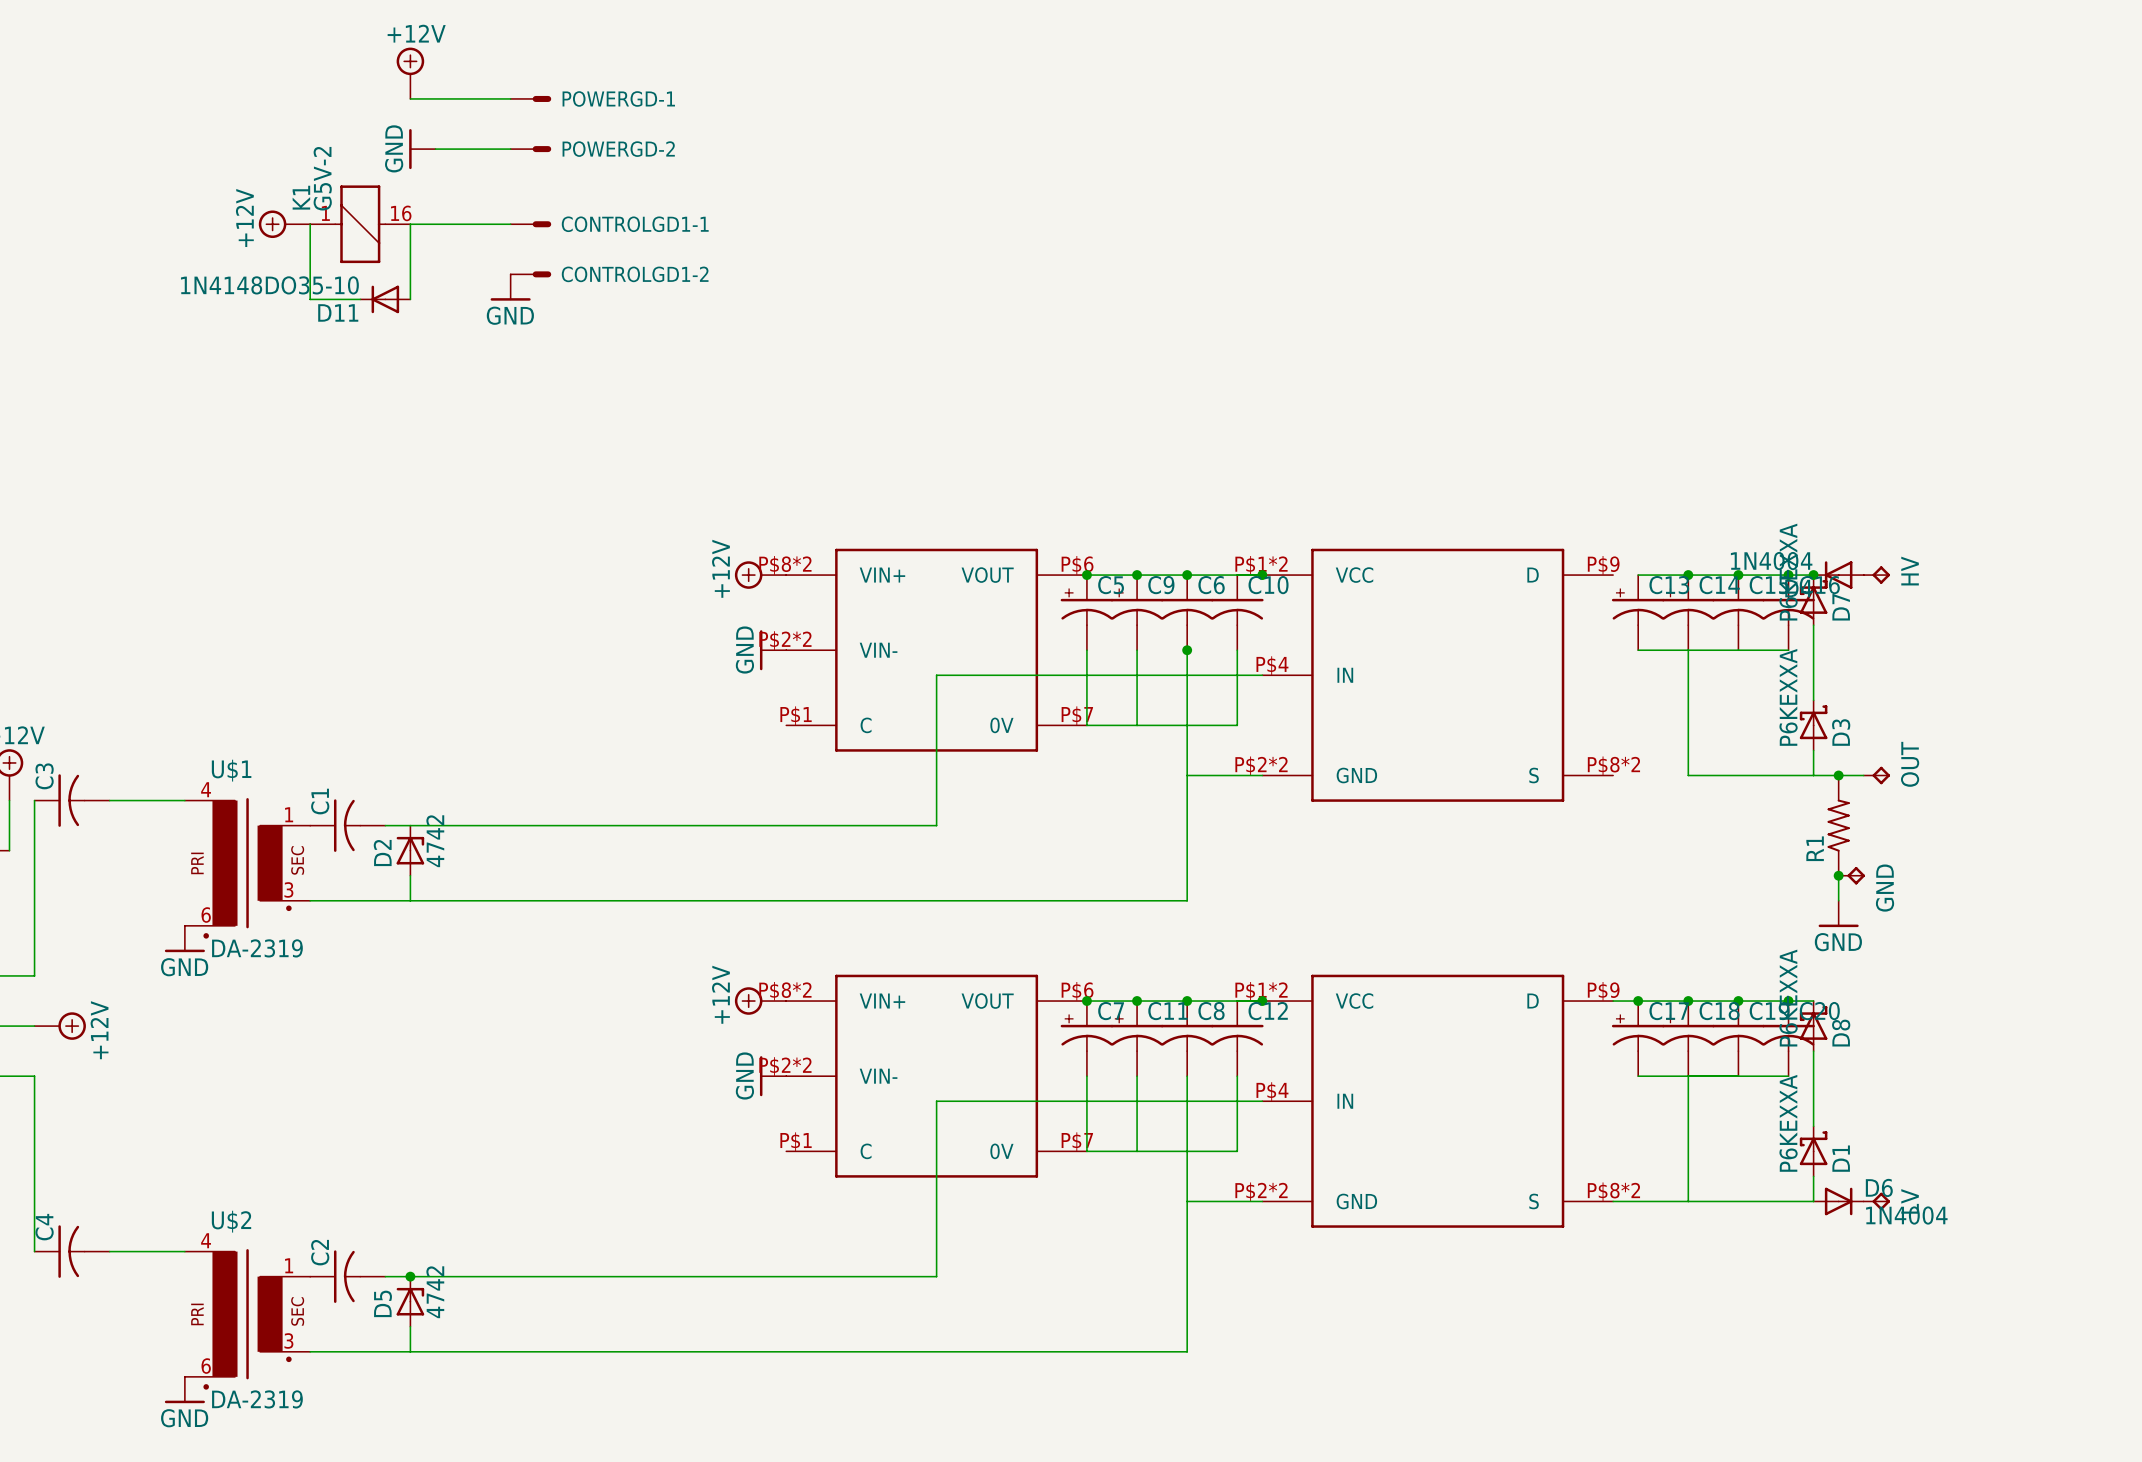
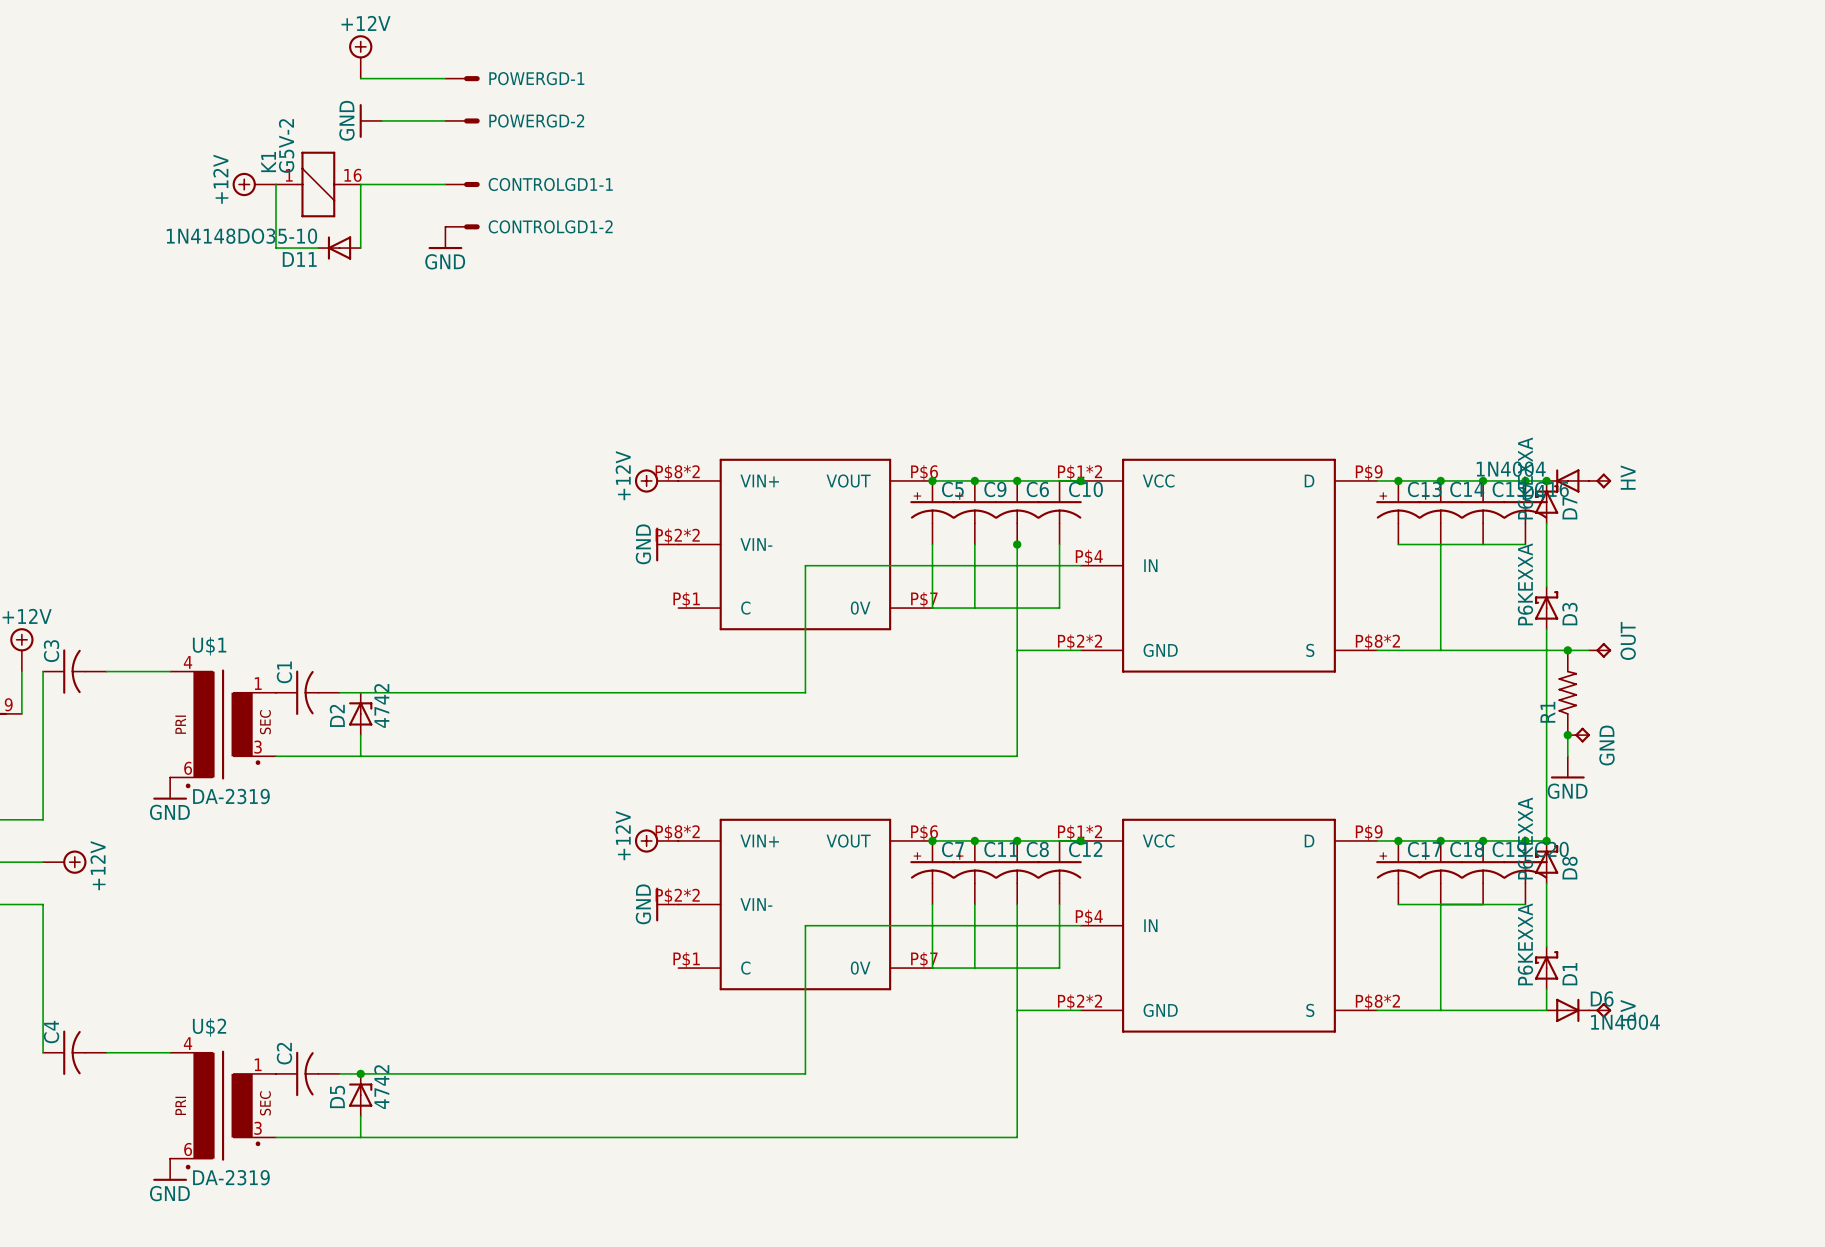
wire: none -> (1377, 480) (1398, 480)
junction: none -> (1398, 480)
wire: none -> (1377, 650) (1440, 650)
wire: none -> (1546, 650) (1546, 840)
junction: none -> (1546, 840)

